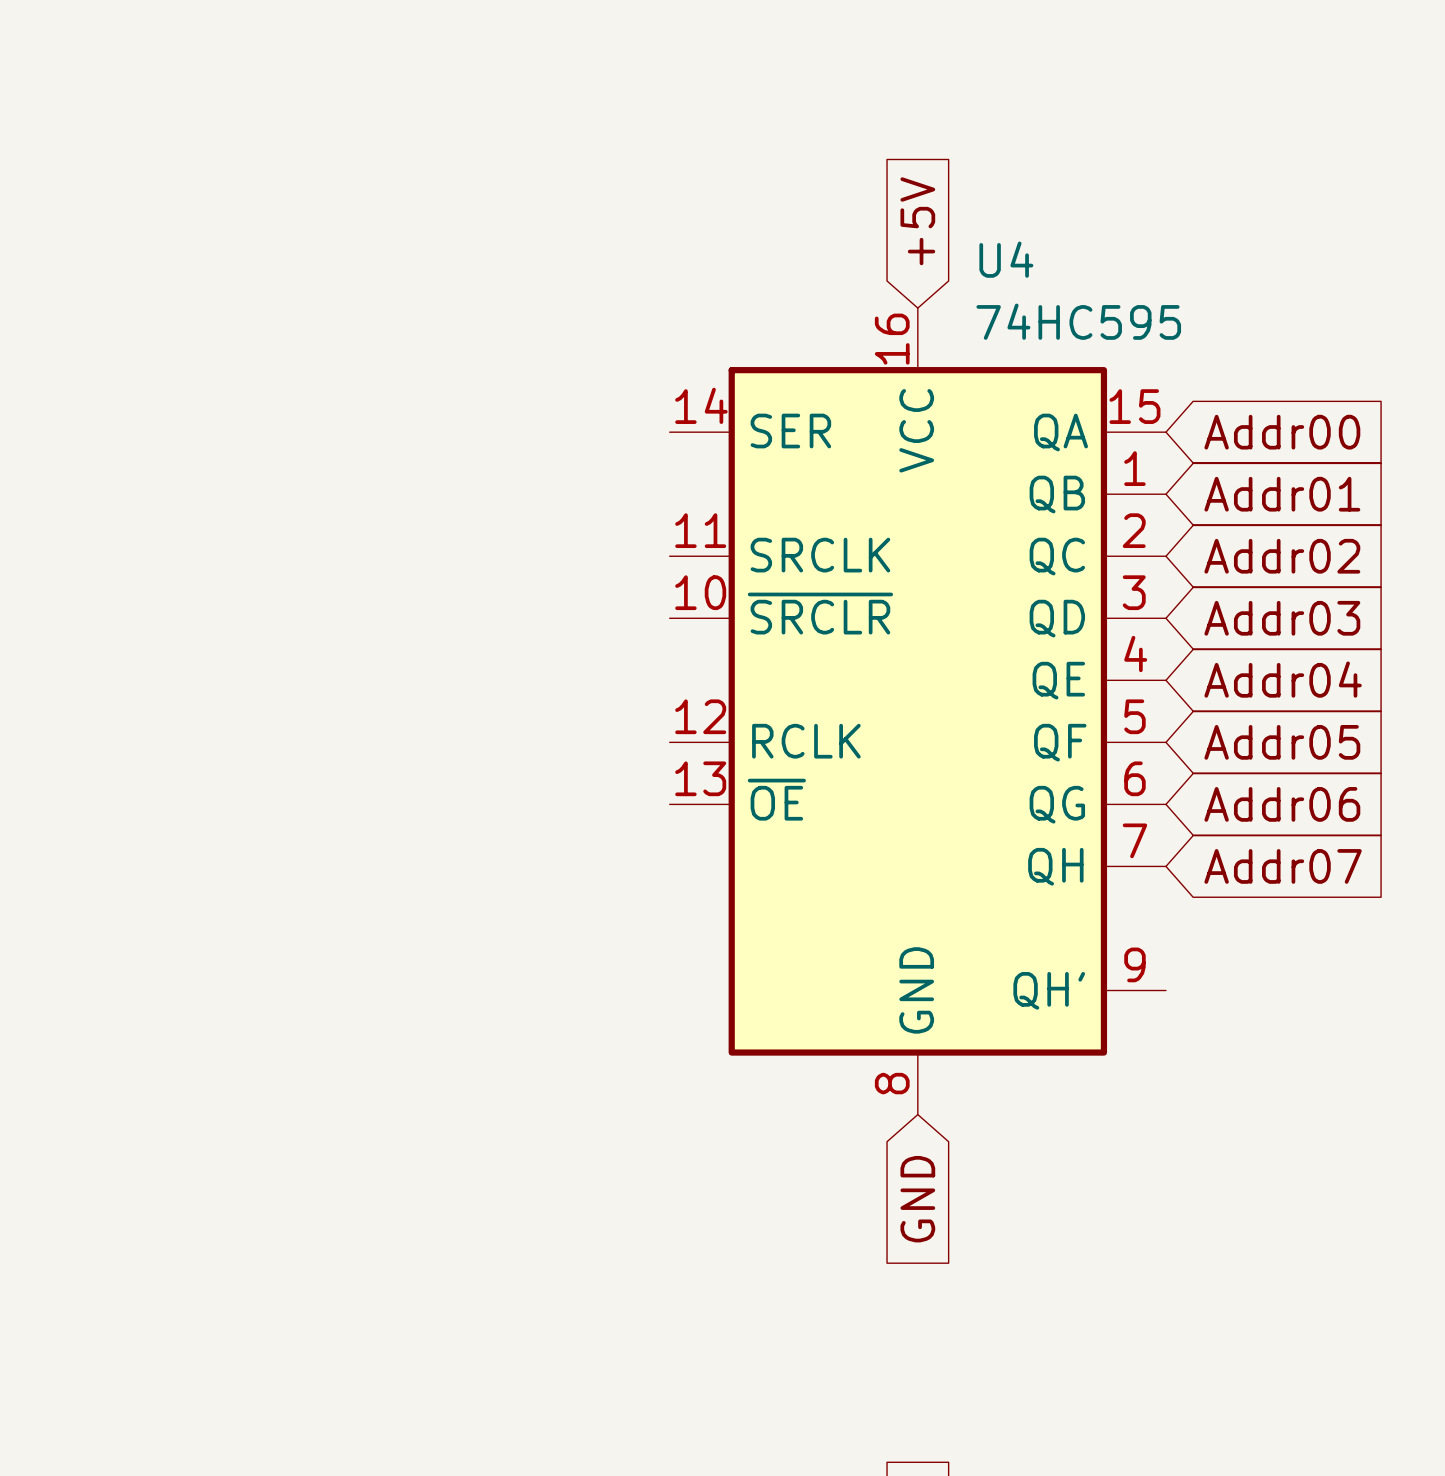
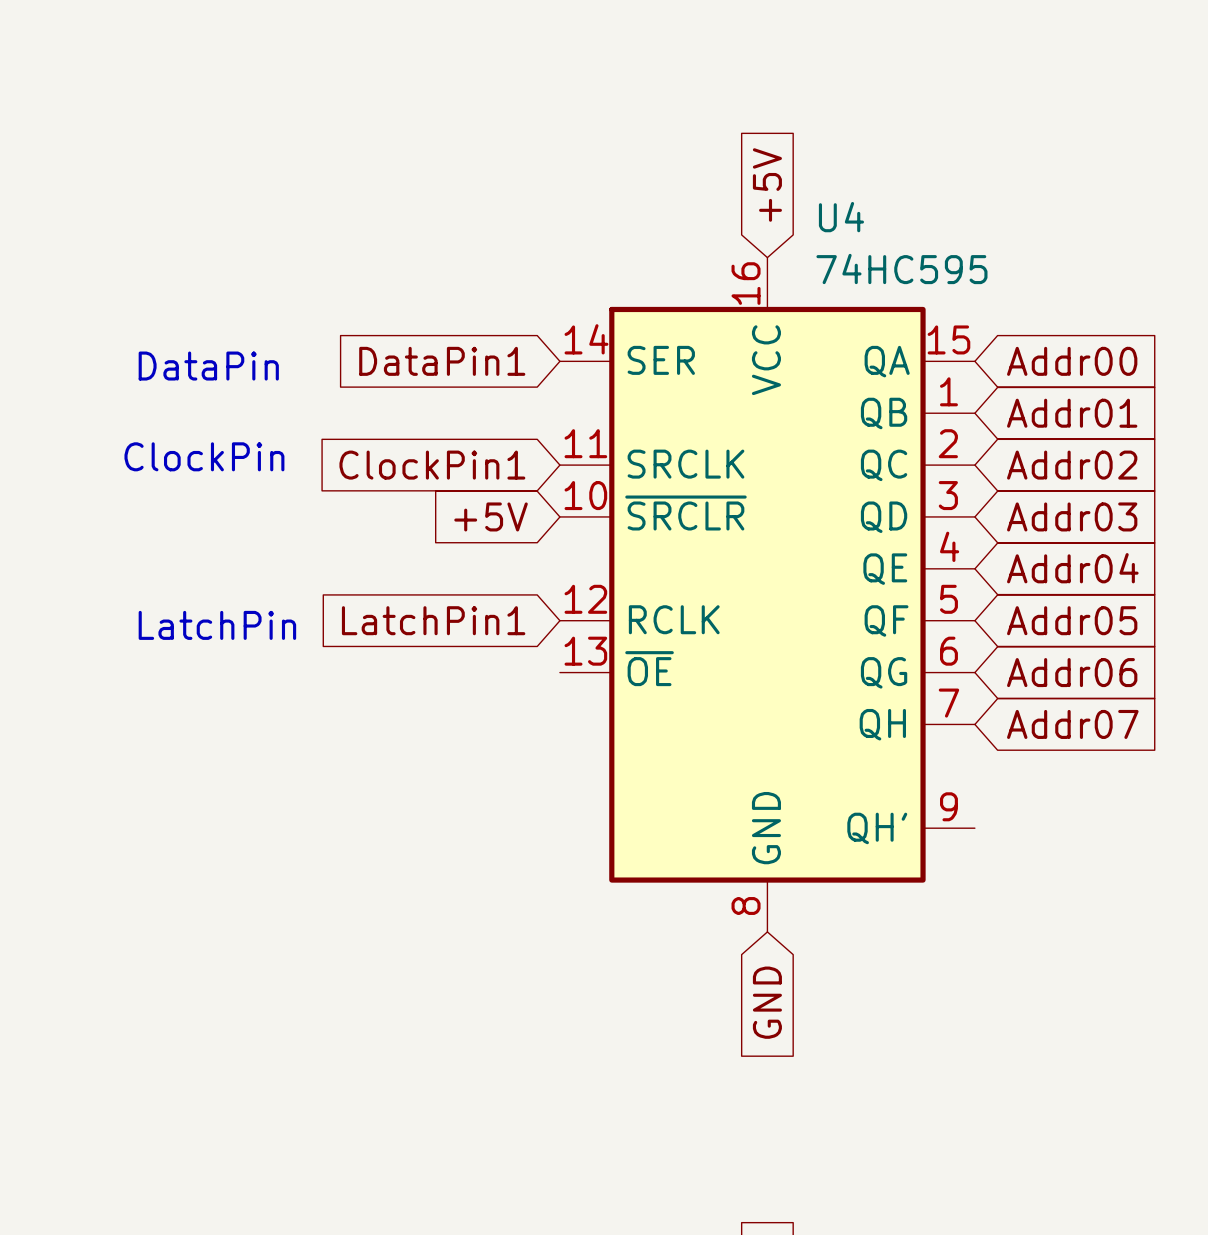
global label: none -> DataPin1 (442, 361)
text: none -> DataPin (208, 366)
text: none -> ClockPin (204, 456)
global label: none -> ClockPin1 (432, 465)
global label: none -> +5V (491, 516)
global label: none -> LatchPin1 (433, 620)
text: none -> LatchPin (217, 625)

